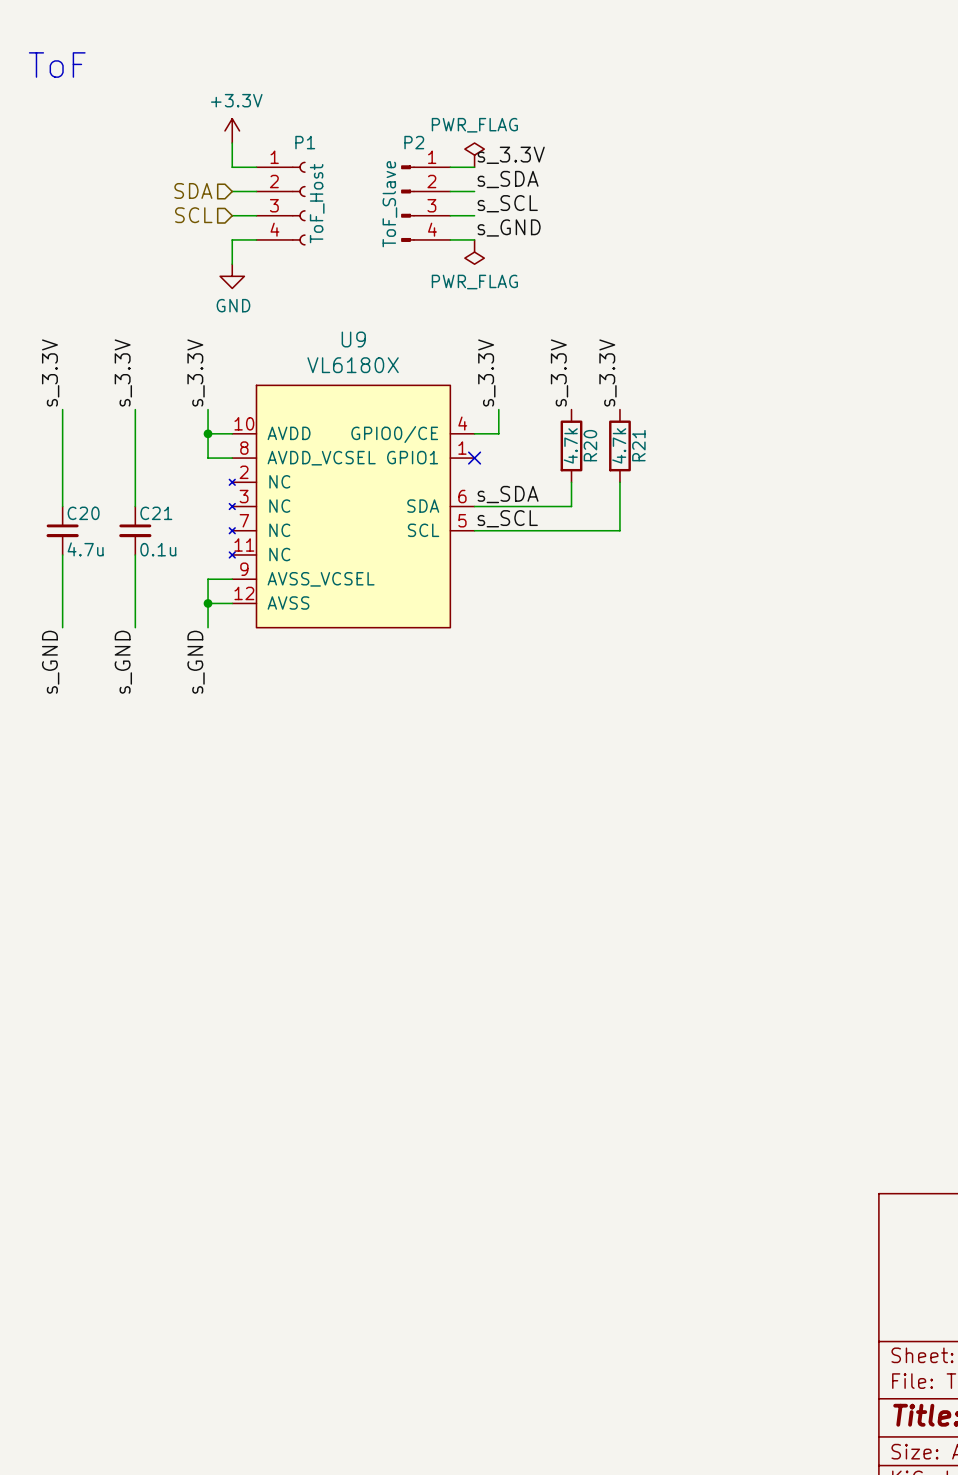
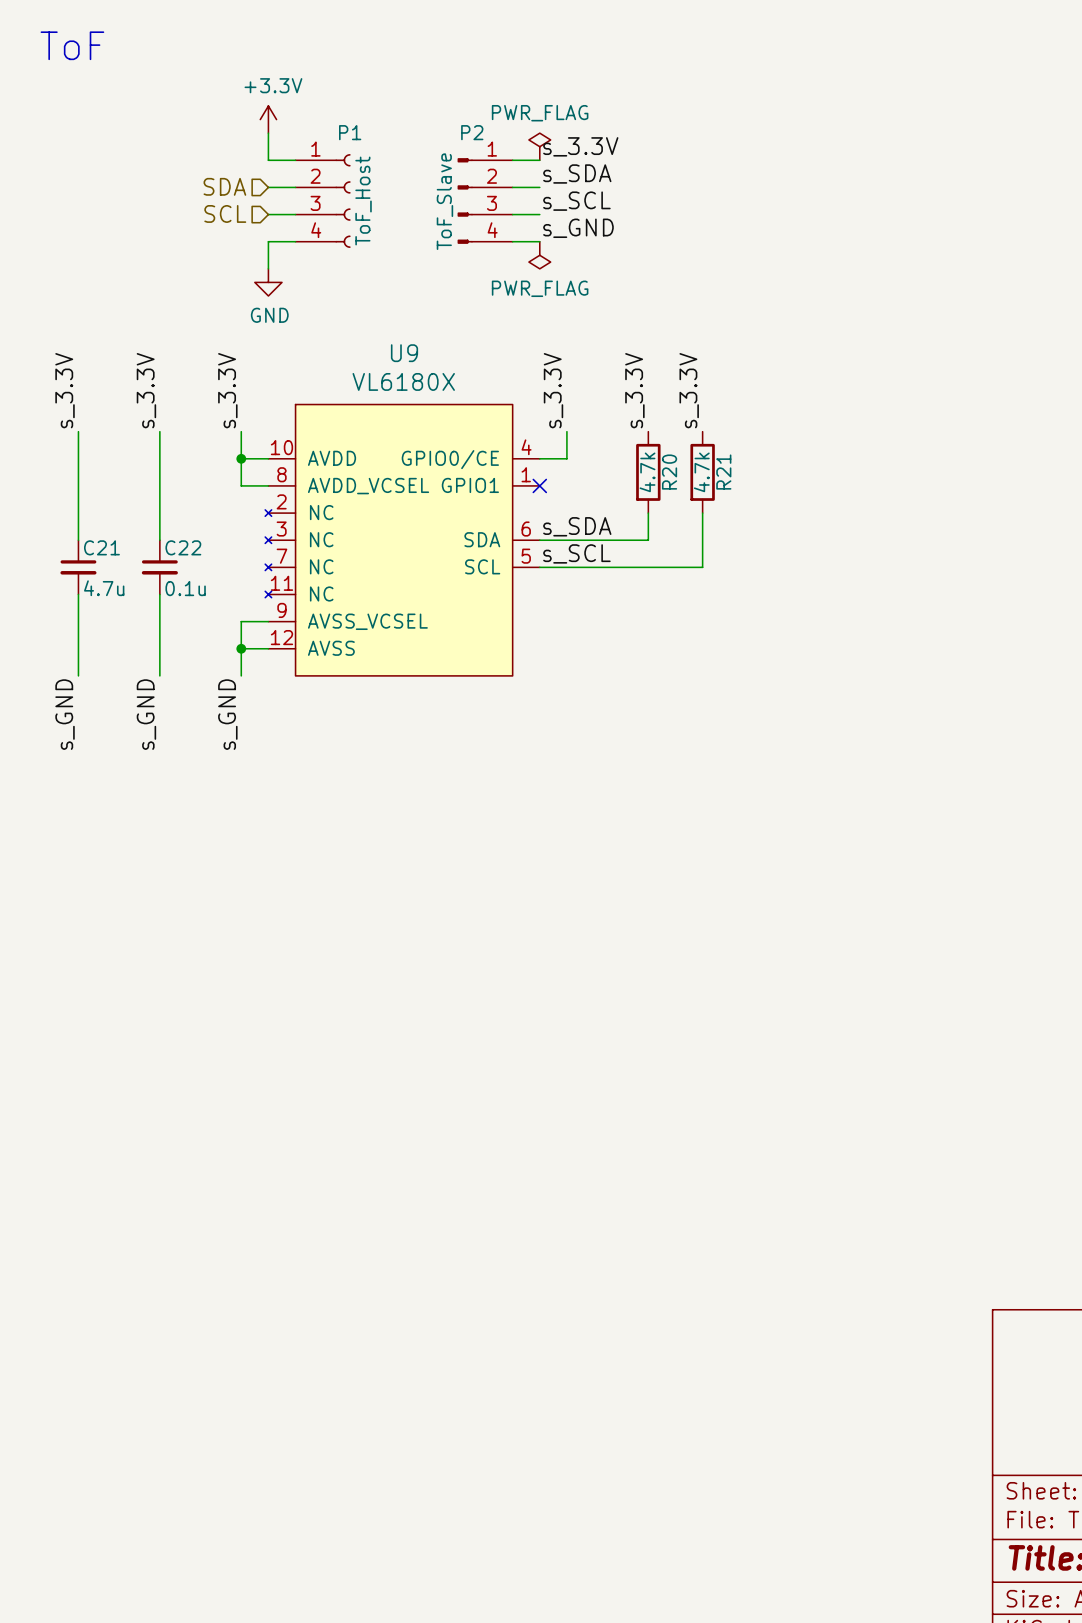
C20 name: C20 (83, 513) -> C21 (101, 547)
C21 name: C21 (156, 513) -> C22 (183, 547)

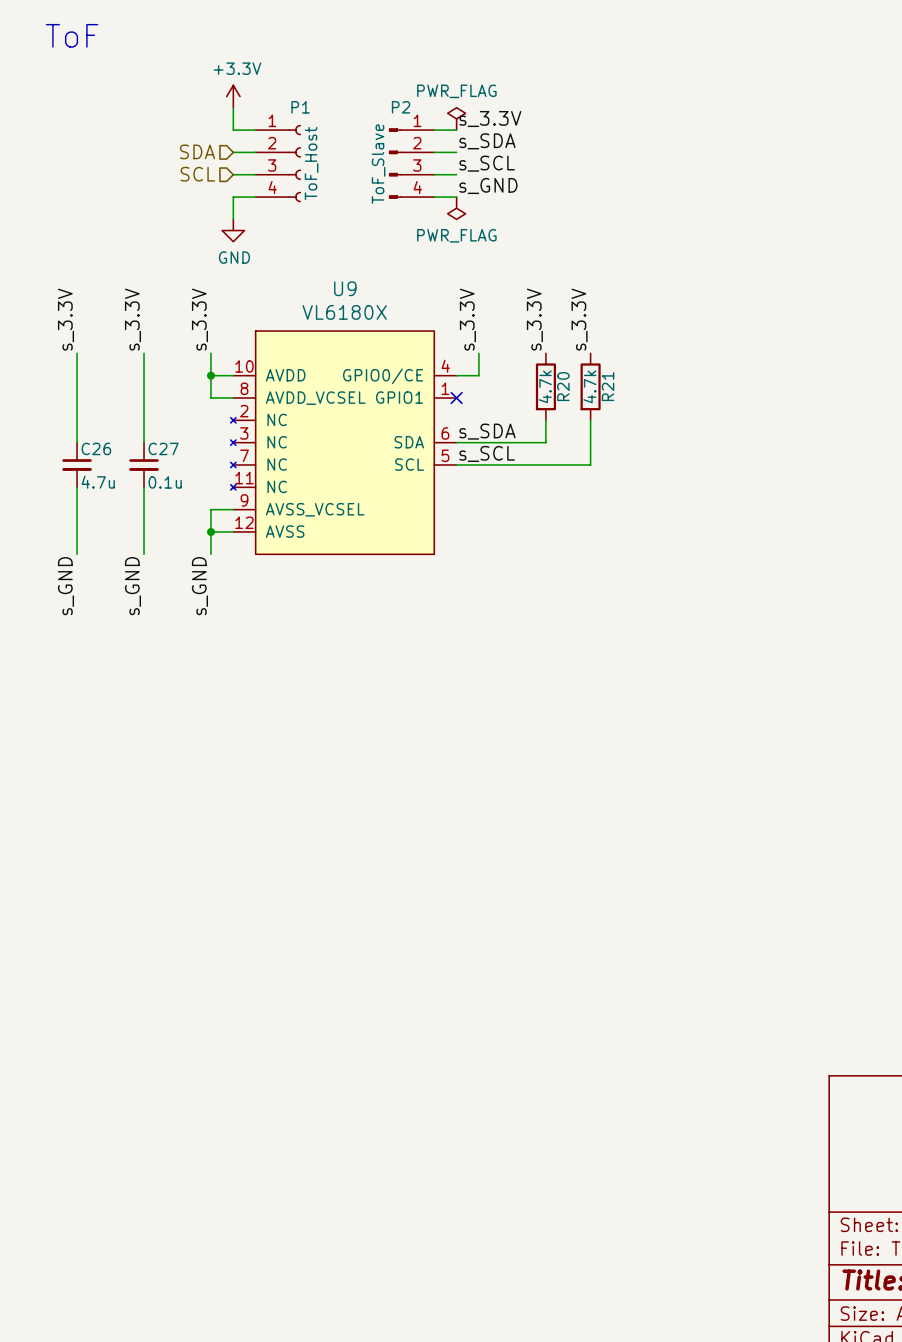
C21 name: C21 (101, 547) -> C26 (96, 448)
C22 name: C22 (183, 547) -> C27 (163, 448)

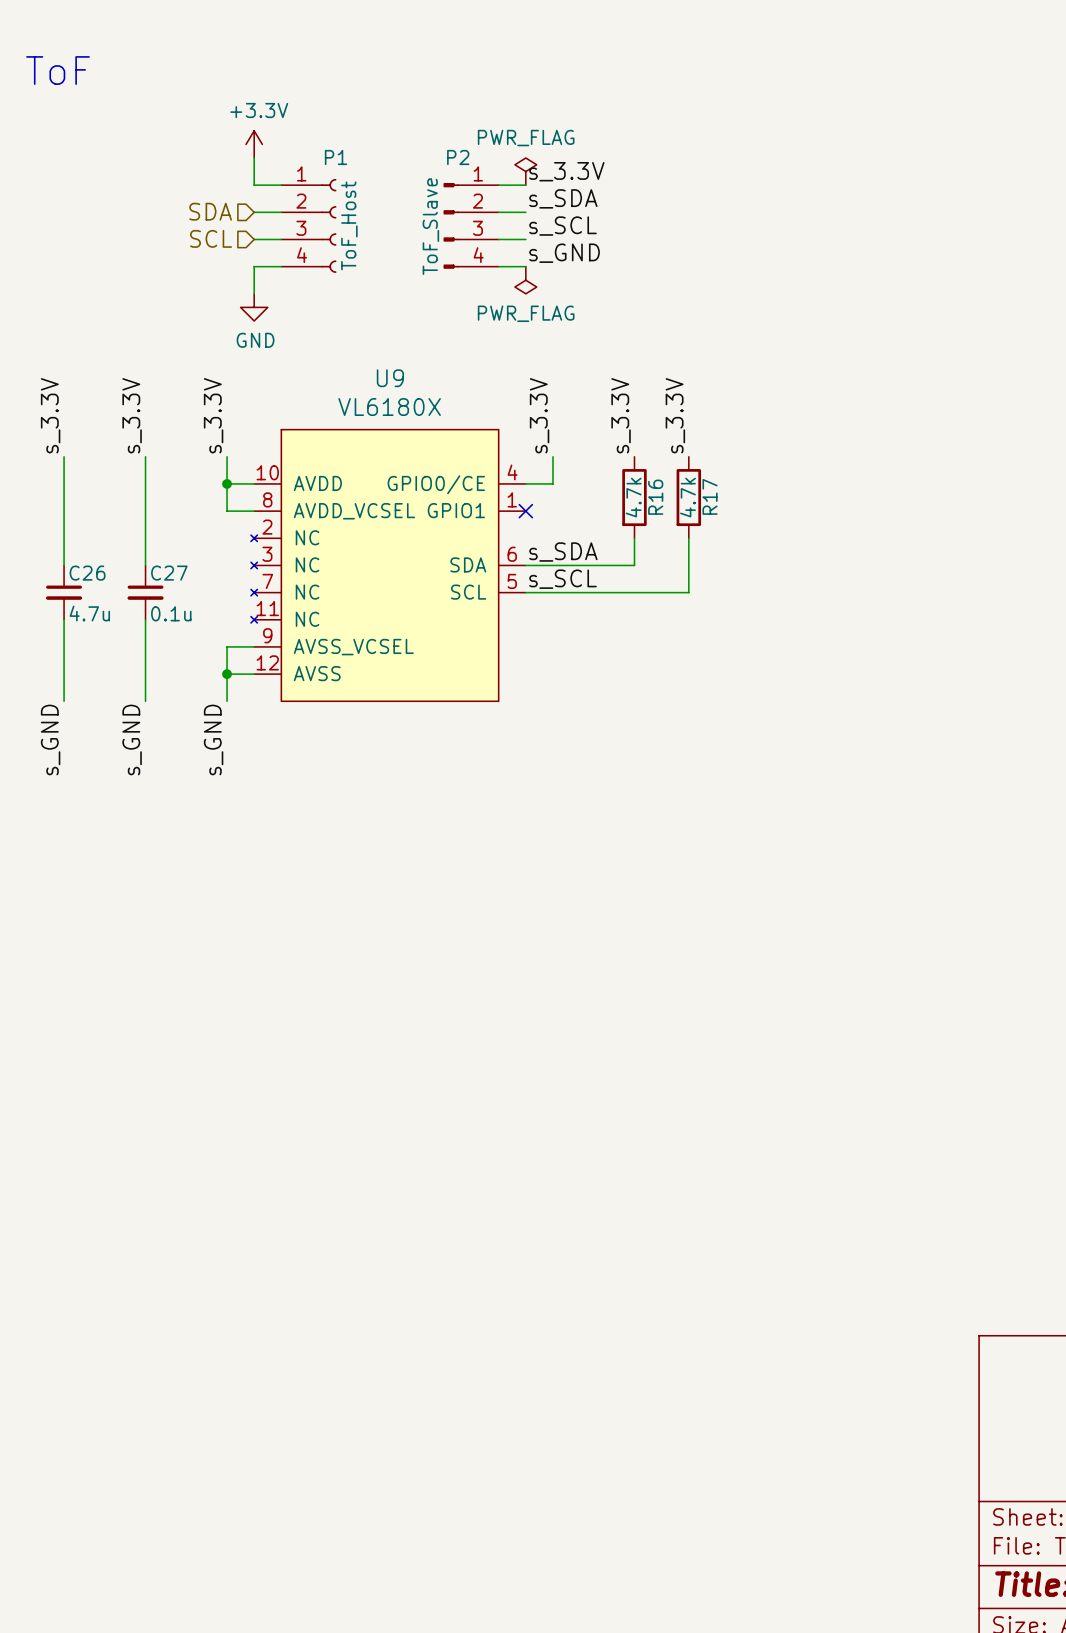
R20 name: R20 (563, 386) -> R16 (655, 497)
R21 name: R21 (608, 386) -> R17 (710, 496)

